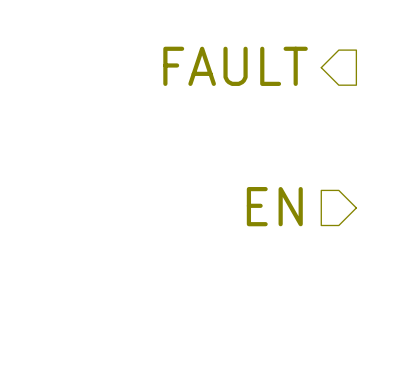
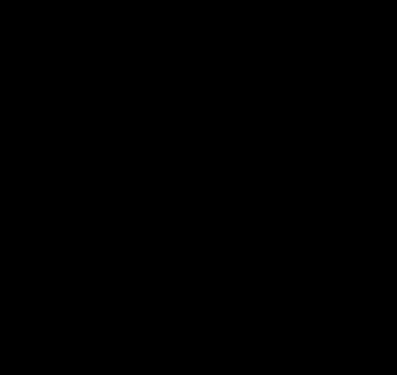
hierarchical label: FAULT (235, 66) -> none
hierarchical label: EN (274, 206) -> none

